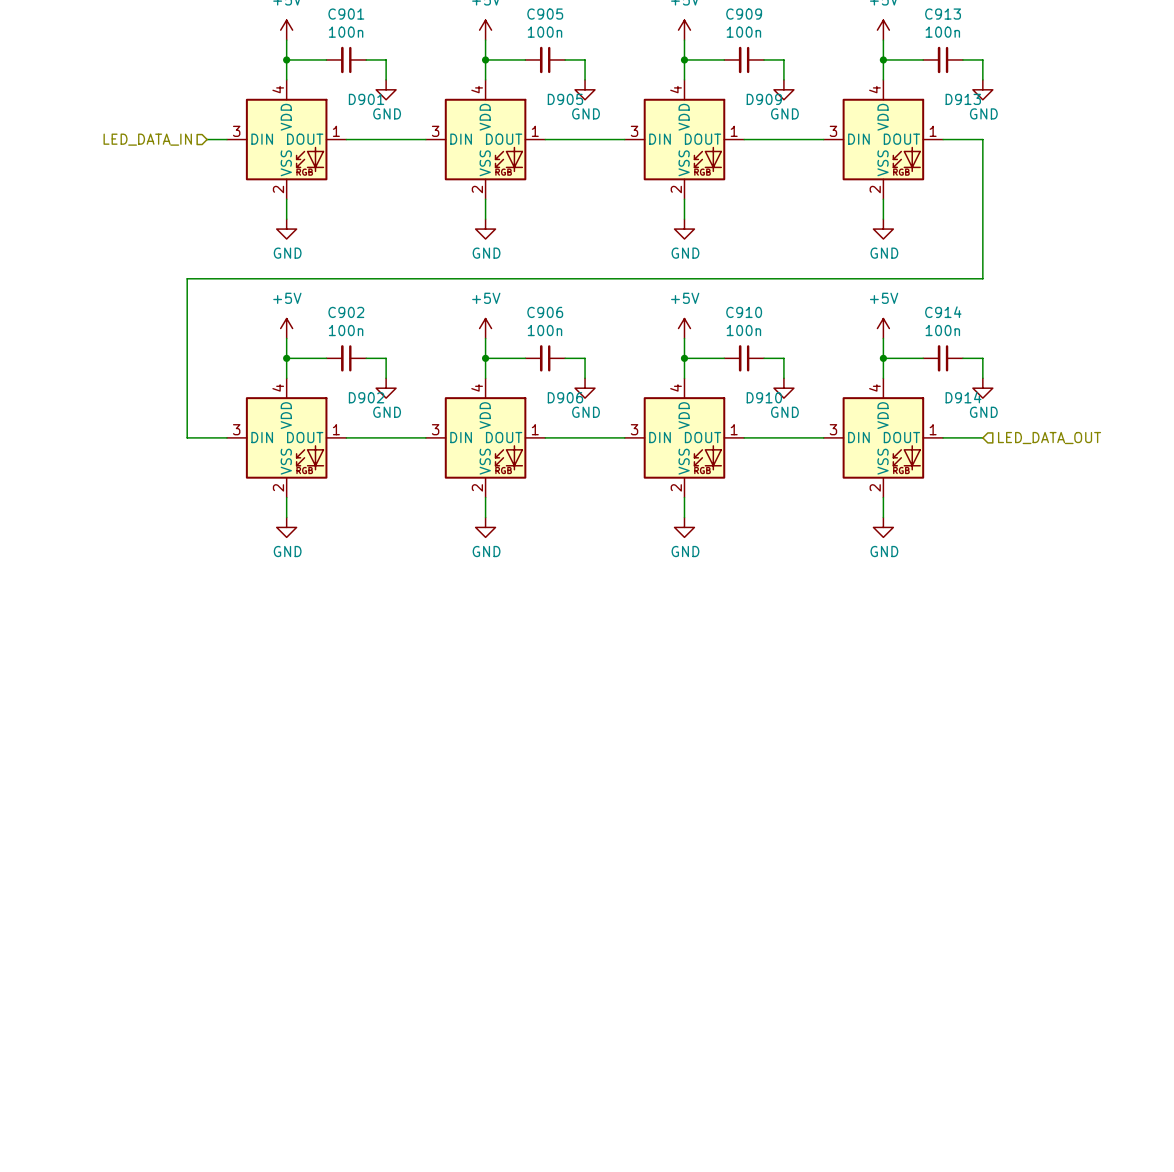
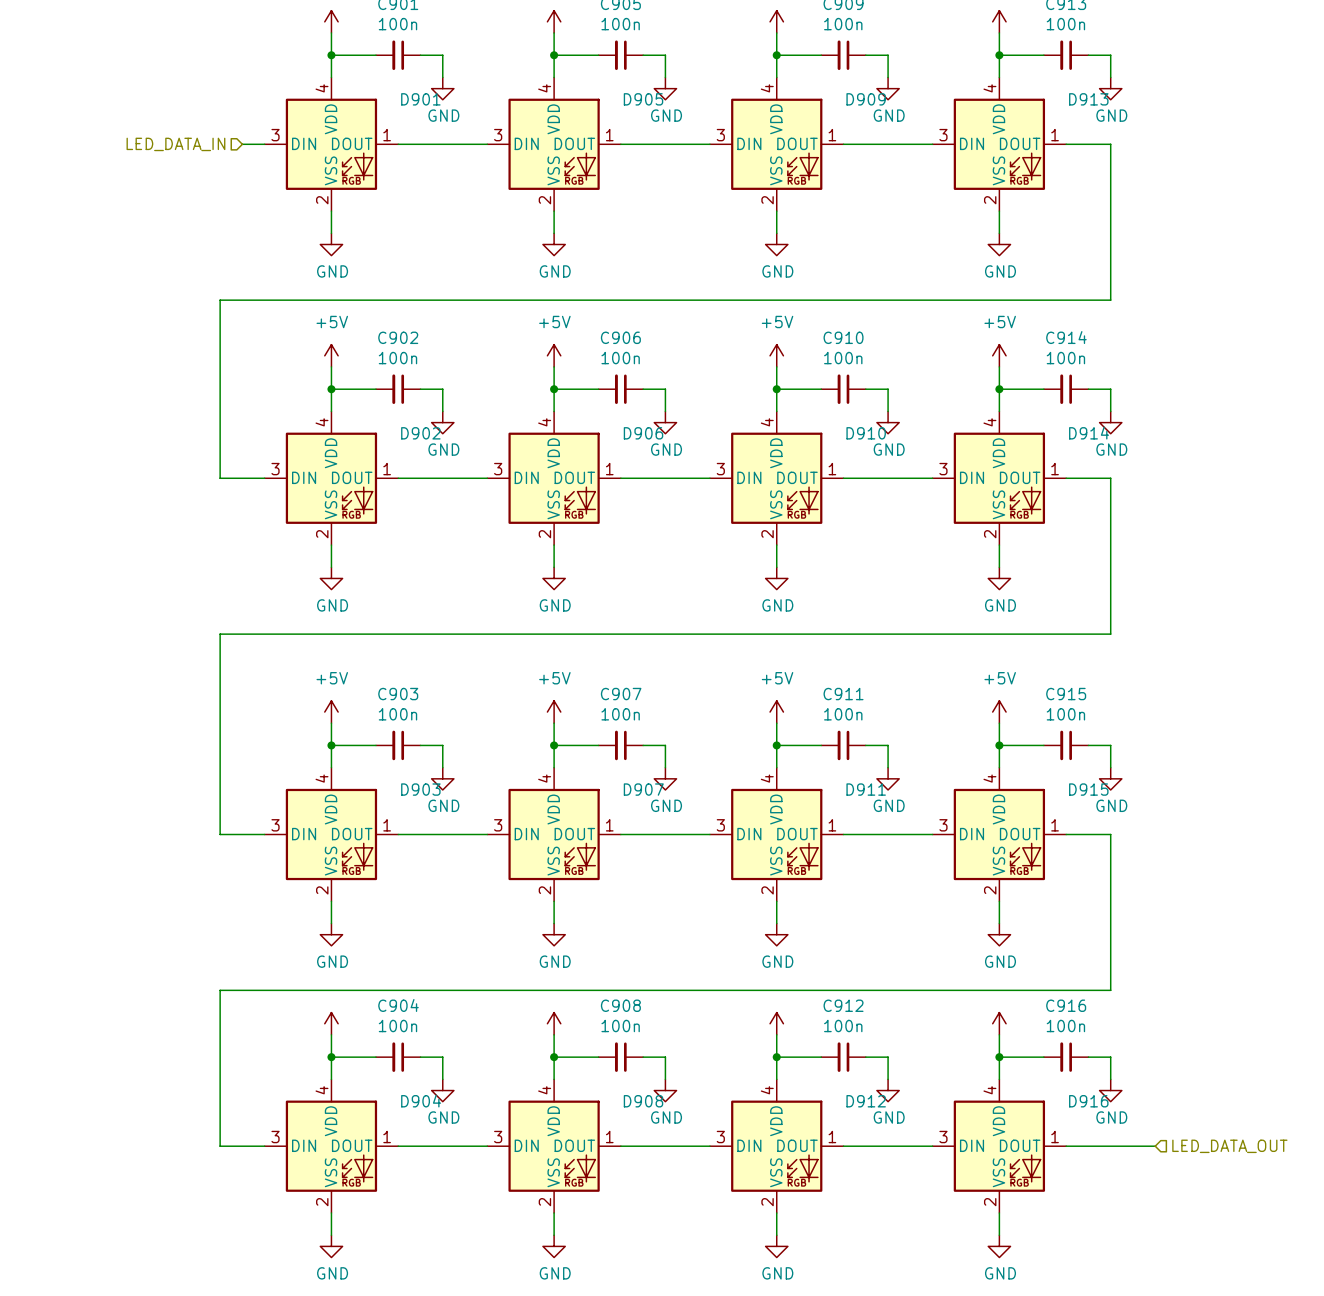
wire: none -> (1110, 478) (1110, 634) (220, 634) (220, 834) (264, 834)
hierarchical label: LED_DATA_OUT (1049, 438) -> none
power symbol: none -> +5V (331, 712)
power symbol: none -> +5V (554, 712)
power symbol: none -> +5V (776, 712)
power symbol: none -> +5V (999, 712)
wire: none -> (331, 723) (331, 767)
wire: none -> (554, 723) (554, 767)
wire: none -> (776, 723) (776, 767)
wire: none -> (999, 723) (999, 767)
wire: none -> (331, 745) (375, 745)
junction: none -> (331, 745)
C903: none -> 100n (398, 745)
wire: none -> (420, 745) (442, 745) (442, 767)
wire: none -> (554, 745) (598, 745)
junction: none -> (554, 745)
C907: none -> 100n (620, 745)
wire: none -> (643, 745) (665, 745) (665, 767)
wire: none -> (776, 745) (821, 745)
junction: none -> (776, 745)
C911: none -> 100n (843, 745)
wire: none -> (865, 745) (888, 745) (888, 767)
wire: none -> (999, 745) (1043, 745)
junction: none -> (999, 745)
C915: none -> 100n (1066, 745)
wire: none -> (1088, 745) (1110, 745) (1110, 767)
power symbol: none -> GND (442, 778)
power symbol: none -> GND (665, 778)
power symbol: none -> GND (888, 778)
power symbol: none -> GND (1110, 778)
D903: none -> (331, 834)
wire: none -> (398, 834) (487, 834)
D907: none -> (554, 834)
wire: none -> (620, 834) (709, 834)
D911: none -> (776, 834)
wire: none -> (843, 834) (932, 834)
D915: none -> (999, 834)
wire: none -> (1066, 834) (1110, 834) (1110, 990) (220, 990) (220, 1146) (264, 1146)
wire: none -> (331, 901) (331, 923)
wire: none -> (554, 901) (554, 923)
wire: none -> (776, 901) (776, 923)
wire: none -> (999, 901) (999, 923)
power symbol: none -> GND (331, 934)
power symbol: none -> GND (554, 934)
power symbol: none -> GND (776, 934)
power symbol: none -> GND (999, 934)
power symbol: none -> (331, 1023)
power symbol: none -> (554, 1023)
power symbol: none -> (776, 1023)
power symbol: none -> (999, 1023)
wire: none -> (331, 1034) (331, 1079)
wire: none -> (554, 1034) (554, 1079)
wire: none -> (776, 1034) (776, 1079)
wire: none -> (999, 1034) (999, 1079)
wire: none -> (331, 1057) (375, 1057)
junction: none -> (331, 1057)
C904: none -> 100n (398, 1057)
wire: none -> (420, 1057) (442, 1057) (442, 1079)
wire: none -> (554, 1057) (598, 1057)
junction: none -> (554, 1057)
C908: none -> 100n (620, 1057)
wire: none -> (643, 1057) (665, 1057) (665, 1079)
wire: none -> (776, 1057) (821, 1057)
junction: none -> (776, 1057)
C912: none -> 100n (843, 1057)
wire: none -> (865, 1057) (888, 1057) (888, 1079)
wire: none -> (999, 1057) (1043, 1057)
junction: none -> (999, 1057)
C916: none -> 100n (1066, 1057)
wire: none -> (1088, 1057) (1110, 1057) (1110, 1079)
power symbol: none -> GND (442, 1090)
power symbol: none -> GND (665, 1090)
power symbol: none -> GND (888, 1090)
power symbol: none -> GND (1110, 1090)
D904: none -> (331, 1146)
wire: none -> (398, 1146) (487, 1146)
D908: none -> (554, 1146)
wire: none -> (620, 1146) (709, 1146)
D912: none -> (776, 1146)
wire: none -> (843, 1146) (932, 1146)
D916: none -> (999, 1146)
wire: none -> (1066, 1146) (1155, 1146)
hierarchical label: none -> LED_DATA_OUT (1229, 1146)
wire: none -> (331, 1213) (331, 1235)
wire: none -> (554, 1213) (554, 1235)
wire: none -> (776, 1213) (776, 1235)
wire: none -> (999, 1213) (999, 1235)
power symbol: none -> GND (331, 1246)
power symbol: none -> GND (554, 1246)
power symbol: none -> GND (776, 1246)
power symbol: none -> GND (999, 1246)

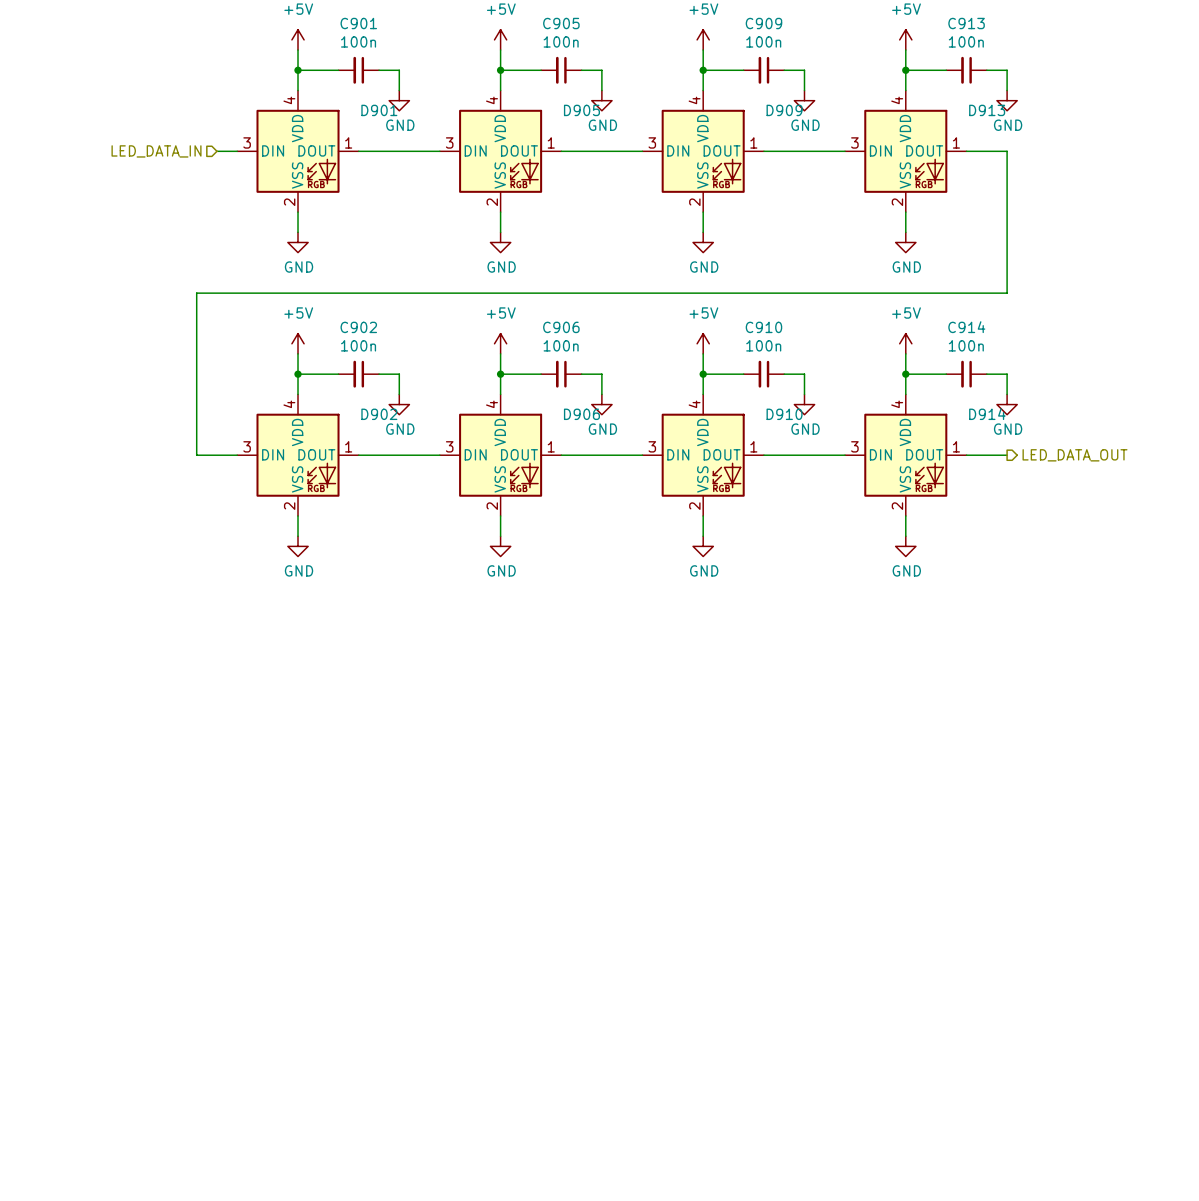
wire: (1110, 478) (1110, 634) (220, 634) (220, 834) (264, 834) -> none
hierarchical label: none -> LED_DATA_OUT (1075, 455)
power symbol: +5V (331, 712) -> none
power symbol: +5V (554, 712) -> none
power symbol: +5V (776, 712) -> none
power symbol: +5V (999, 712) -> none
wire: (331, 723) (331, 767) -> none
wire: (554, 723) (554, 767) -> none
wire: (776, 723) (776, 767) -> none
wire: (999, 723) (999, 767) -> none
wire: (331, 745) (375, 745) -> none
junction: (331, 745) -> none
C903: 100n (398, 745) -> none
wire: (420, 745) (442, 745) (442, 767) -> none
wire: (554, 745) (598, 745) -> none
junction: (554, 745) -> none
C907: 100n (620, 745) -> none
wire: (643, 745) (665, 745) (665, 767) -> none
wire: (776, 745) (821, 745) -> none
junction: (776, 745) -> none
C911: 100n (843, 745) -> none
wire: (865, 745) (888, 745) (888, 767) -> none
wire: (999, 745) (1043, 745) -> none
junction: (999, 745) -> none
C915: 100n (1066, 745) -> none
wire: (1088, 745) (1110, 745) (1110, 767) -> none
power symbol: GND (442, 778) -> none
power symbol: GND (665, 778) -> none
power symbol: GND (888, 778) -> none
power symbol: GND (1110, 778) -> none
D903: (331, 834) -> none
wire: (398, 834) (487, 834) -> none
D907: (554, 834) -> none
wire: (620, 834) (709, 834) -> none
D911: (776, 834) -> none
wire: (843, 834) (932, 834) -> none
D915: (999, 834) -> none
wire: (1066, 834) (1110, 834) (1110, 990) (220, 990) (220, 1146) (264, 1146) -> none
wire: (331, 901) (331, 923) -> none
wire: (554, 901) (554, 923) -> none
wire: (776, 901) (776, 923) -> none
wire: (999, 901) (999, 923) -> none
power symbol: GND (331, 934) -> none
power symbol: GND (554, 934) -> none
power symbol: GND (776, 934) -> none
power symbol: GND (999, 934) -> none
power symbol: (331, 1023) -> none
power symbol: (554, 1023) -> none
power symbol: (776, 1023) -> none
power symbol: (999, 1023) -> none
wire: (331, 1034) (331, 1079) -> none
wire: (554, 1034) (554, 1079) -> none
wire: (776, 1034) (776, 1079) -> none
wire: (999, 1034) (999, 1079) -> none
wire: (331, 1057) (375, 1057) -> none
junction: (331, 1057) -> none
C904: 100n (398, 1057) -> none
wire: (420, 1057) (442, 1057) (442, 1079) -> none
wire: (554, 1057) (598, 1057) -> none
junction: (554, 1057) -> none
C908: 100n (620, 1057) -> none
wire: (643, 1057) (665, 1057) (665, 1079) -> none
wire: (776, 1057) (821, 1057) -> none
junction: (776, 1057) -> none
C912: 100n (843, 1057) -> none
wire: (865, 1057) (888, 1057) (888, 1079) -> none
wire: (999, 1057) (1043, 1057) -> none
junction: (999, 1057) -> none
C916: 100n (1066, 1057) -> none
wire: (1088, 1057) (1110, 1057) (1110, 1079) -> none
power symbol: GND (442, 1090) -> none
power symbol: GND (665, 1090) -> none
power symbol: GND (888, 1090) -> none
power symbol: GND (1110, 1090) -> none
D904: (331, 1146) -> none
wire: (398, 1146) (487, 1146) -> none
D908: (554, 1146) -> none
wire: (620, 1146) (709, 1146) -> none
D912: (776, 1146) -> none
wire: (843, 1146) (932, 1146) -> none
D916: (999, 1146) -> none
wire: (1066, 1146) (1155, 1146) -> none
hierarchical label: LED_DATA_OUT (1229, 1146) -> none
wire: (331, 1213) (331, 1235) -> none
wire: (554, 1213) (554, 1235) -> none
wire: (776, 1213) (776, 1235) -> none
wire: (999, 1213) (999, 1235) -> none
power symbol: GND (331, 1246) -> none
power symbol: GND (554, 1246) -> none
power symbol: GND (776, 1246) -> none
power symbol: GND (999, 1246) -> none

